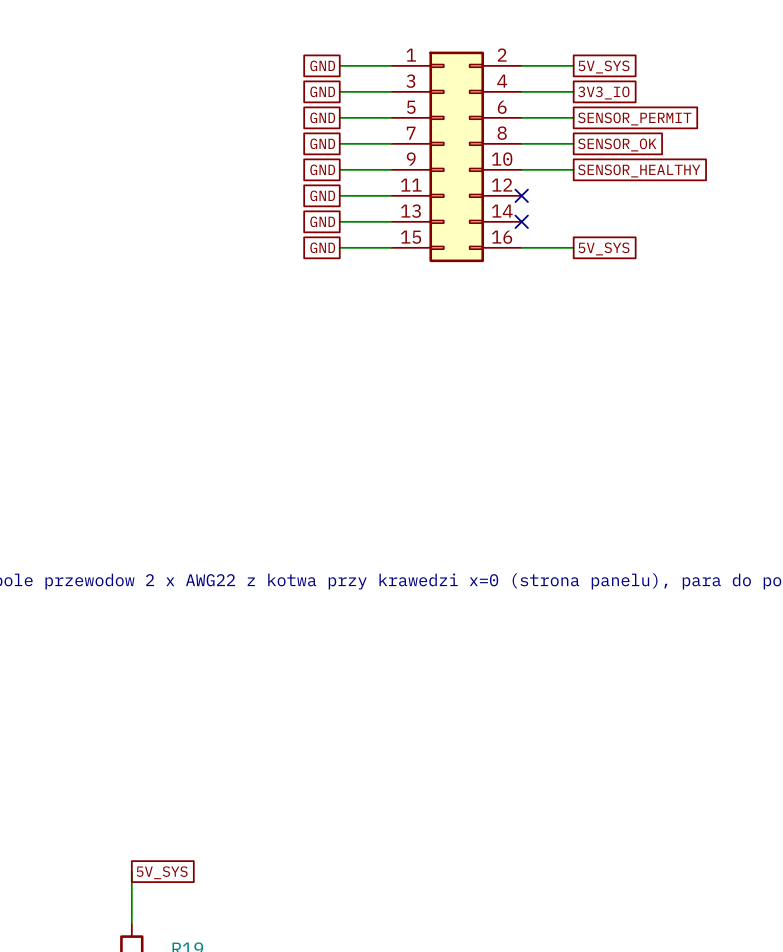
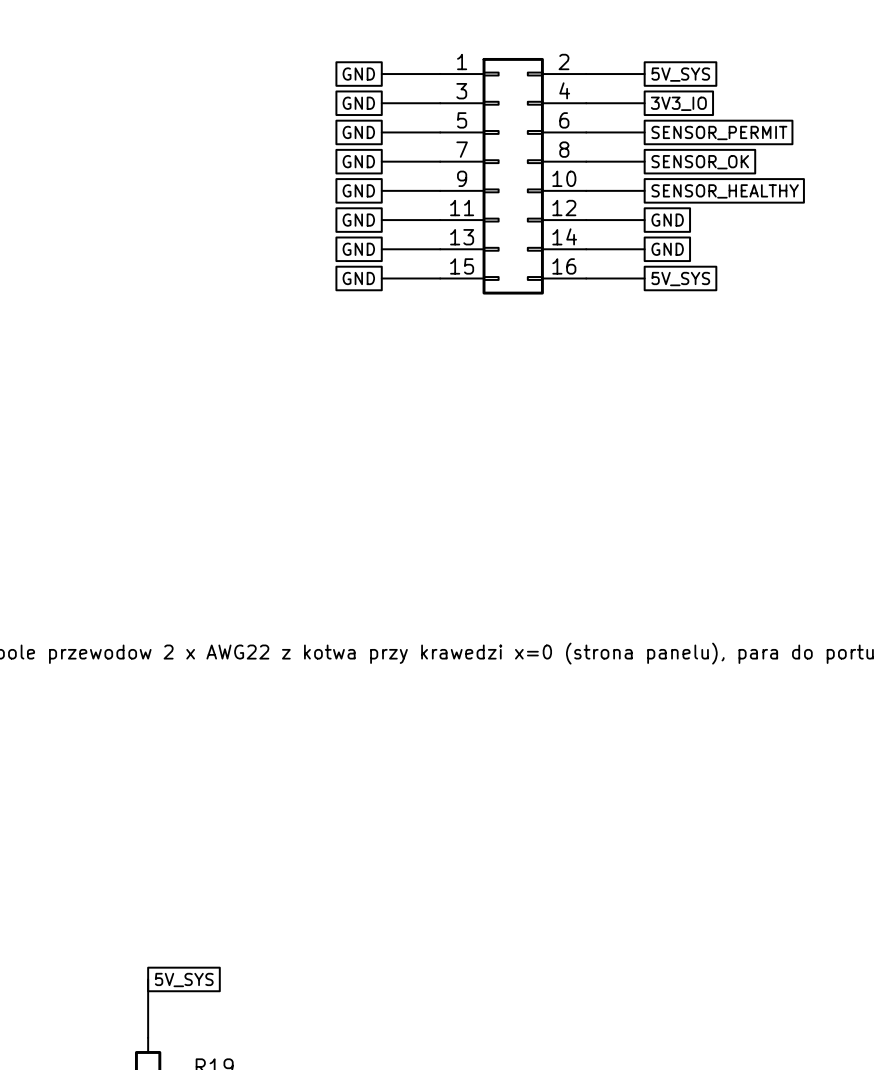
wire: none -> (586, 220) (644, 220)
no-connect mark: (521, 195) -> none
global label: none -> GND (667, 220)
wire: none -> (586, 249) (644, 249)
no-connect mark: (521, 221) -> none
global label: none -> GND (667, 249)

